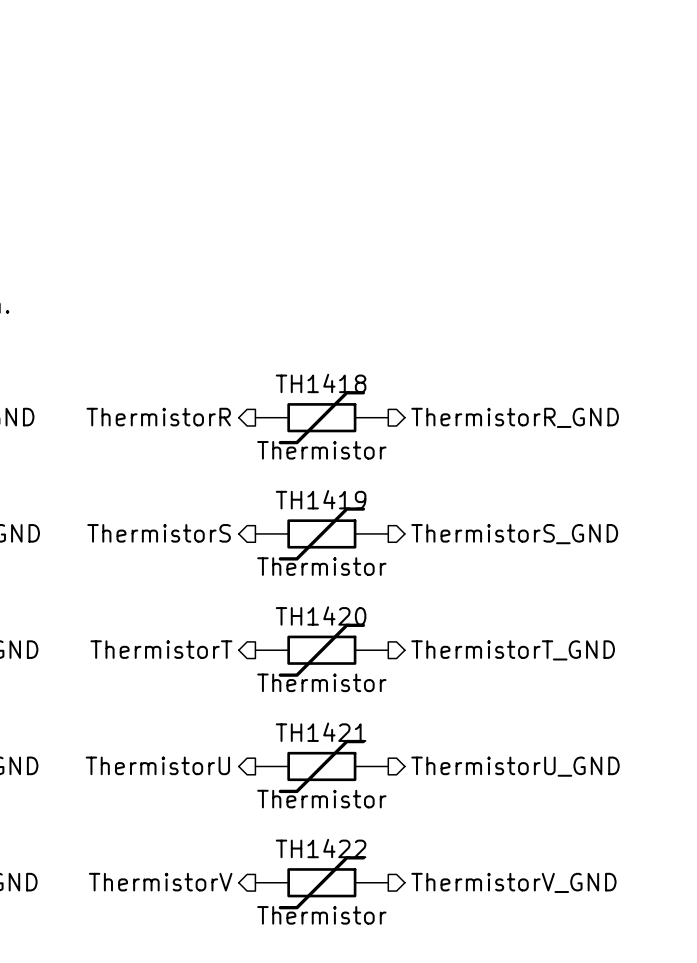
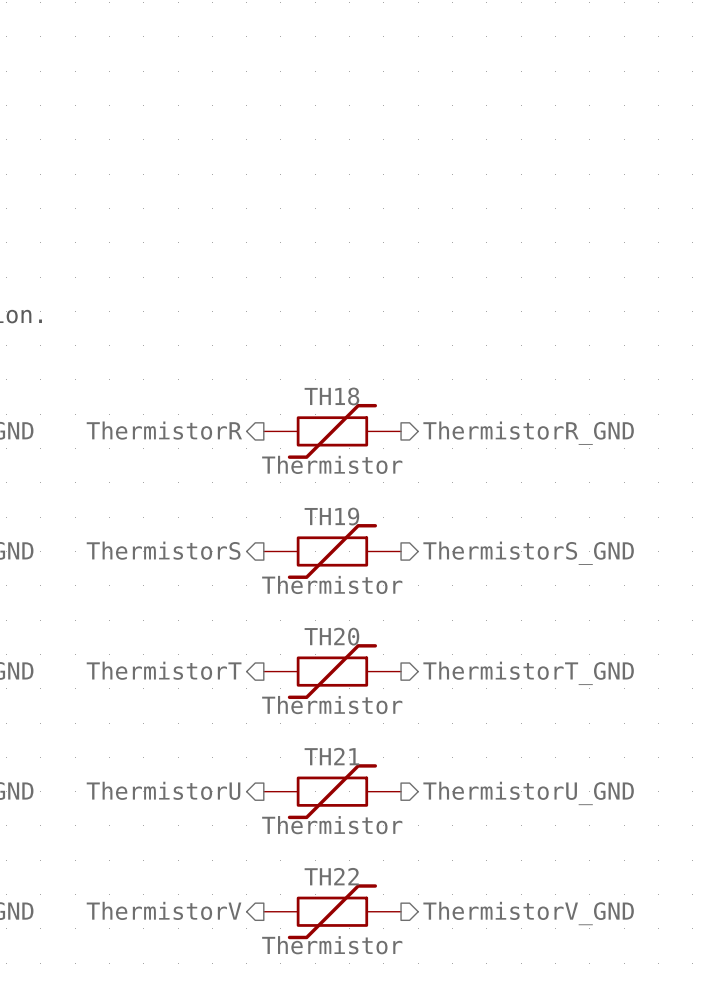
TH1418 name: TH1418 (321, 383) -> TH18 (331, 396)
TH1419 name: TH1419 (321, 499) -> TH19 (331, 516)
TH1420 name: TH1420 (321, 615) -> TH20 (331, 636)
TH1421 name: TH1421 (321, 732) -> TH21 (331, 756)
TH1422 name: TH1422 (321, 848) -> TH22 (331, 876)

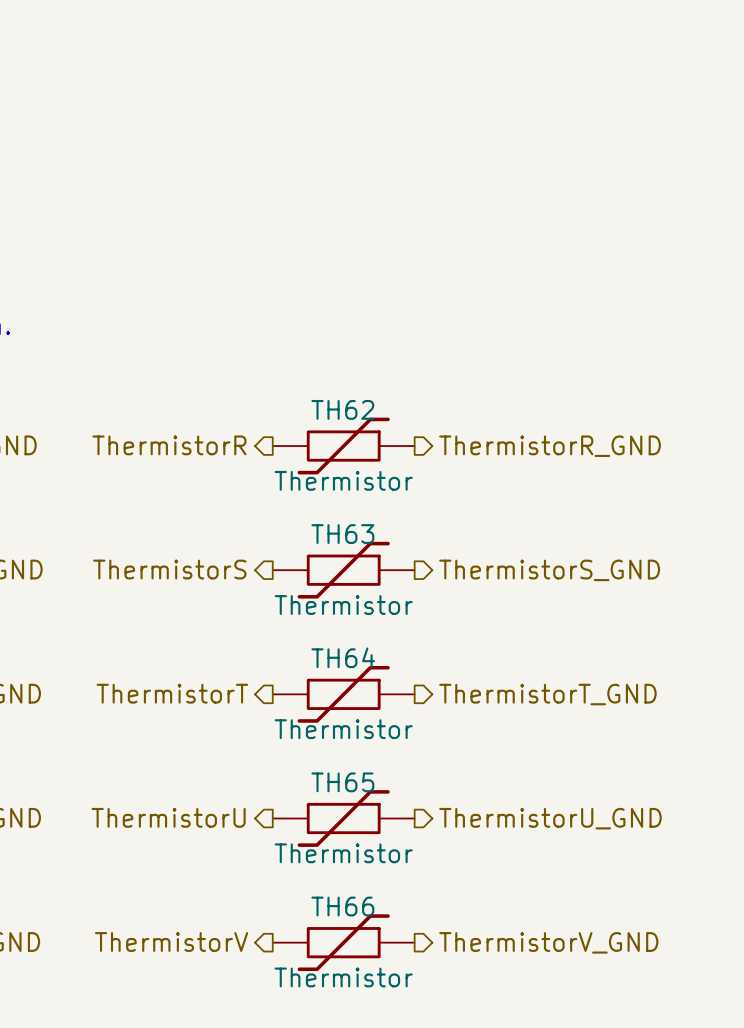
TH18 name: TH18 (331, 396) -> TH62 (342, 409)
TH19 name: TH19 (331, 516) -> TH63 (342, 534)
TH20 name: TH20 (331, 636) -> TH64 (343, 657)
TH21 name: TH21 (331, 756) -> TH65 (342, 782)
TH22 name: TH22 (331, 876) -> TH66 (342, 906)

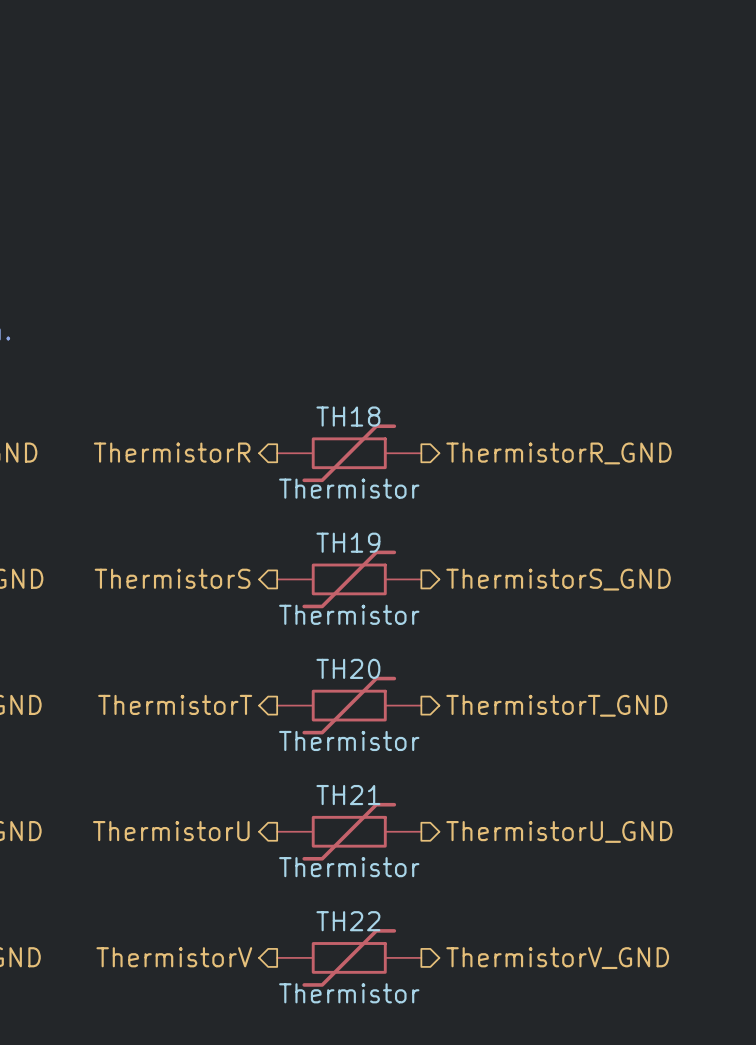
TH62 name: TH62 (342, 409) -> TH18 (348, 416)
TH63 name: TH63 (342, 534) -> TH19 (348, 542)
TH64 name: TH64 (343, 657) -> TH20 (348, 668)
TH65 name: TH65 (342, 782) -> TH21 (348, 795)
TH66 name: TH66 (342, 906) -> TH22 (348, 921)

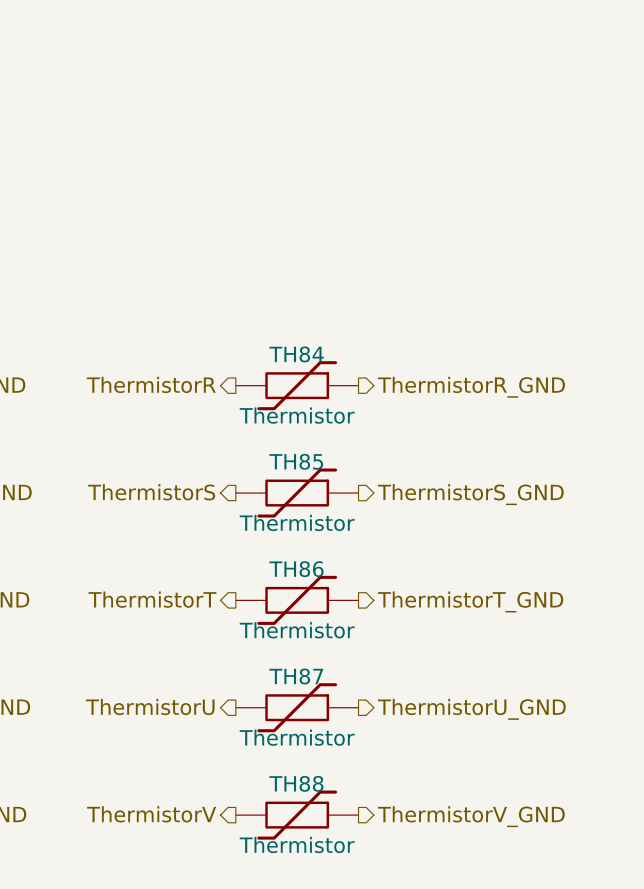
TH18 name: TH18 (348, 416) -> TH84 (296, 354)
TH19 name: TH19 (348, 542) -> TH85 (296, 461)
TH20 name: TH20 (348, 668) -> TH86 (296, 569)
TH21 name: TH21 (348, 795) -> TH87 (296, 676)
TH22 name: TH22 (348, 921) -> TH88 (296, 783)

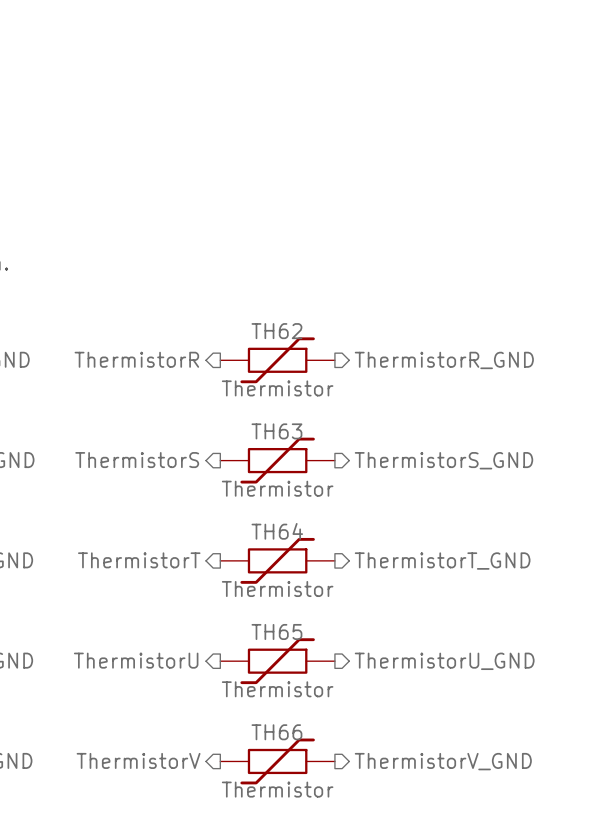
TH84 name: TH84 (296, 354) -> TH62 (276, 331)
TH85 name: TH85 (296, 461) -> TH63 (276, 431)
TH86 name: TH86 (296, 569) -> TH64 (277, 531)
TH87 name: TH87 (296, 676) -> TH65 (276, 631)
TH88 name: TH88 (296, 783) -> TH66 (276, 732)

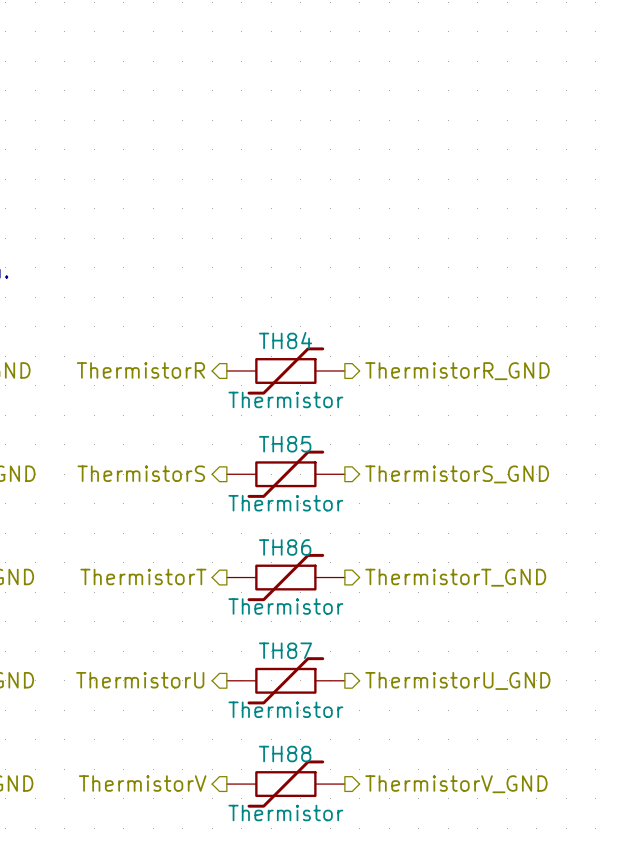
TH62 name: TH62 (276, 331) -> TH84 (285, 340)
TH63 name: TH63 (276, 431) -> TH85 (285, 444)
TH64 name: TH64 (277, 531) -> TH86 (285, 547)
TH65 name: TH65 (276, 631) -> TH87 (285, 650)
TH66 name: TH66 (276, 732) -> TH88 (285, 754)

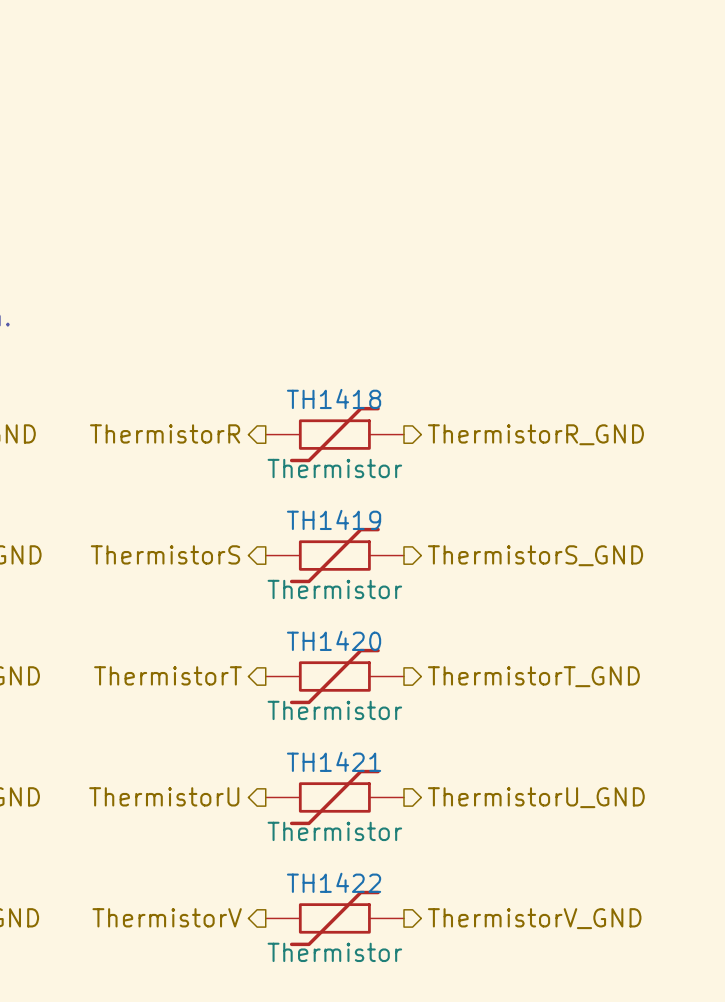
TH84 name: TH84 (285, 340) -> TH1418 (334, 398)
TH85 name: TH85 (285, 444) -> TH1419 (334, 519)
TH86 name: TH86 (285, 547) -> TH1420 (334, 640)
TH87 name: TH87 (285, 650) -> TH1421 (334, 761)
TH88 name: TH88 (285, 754) -> TH1422 (334, 882)

